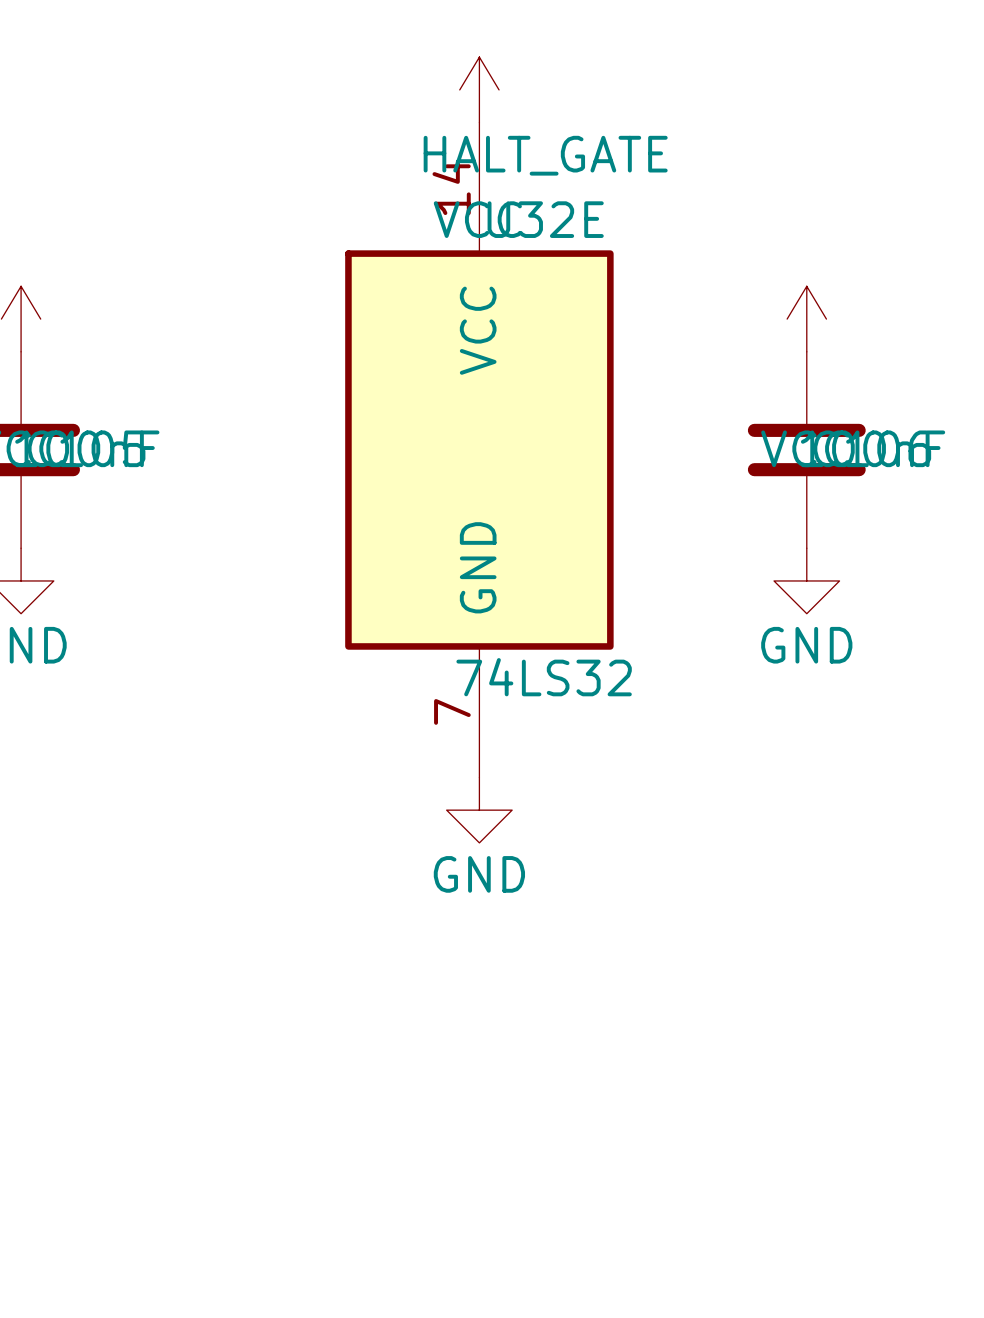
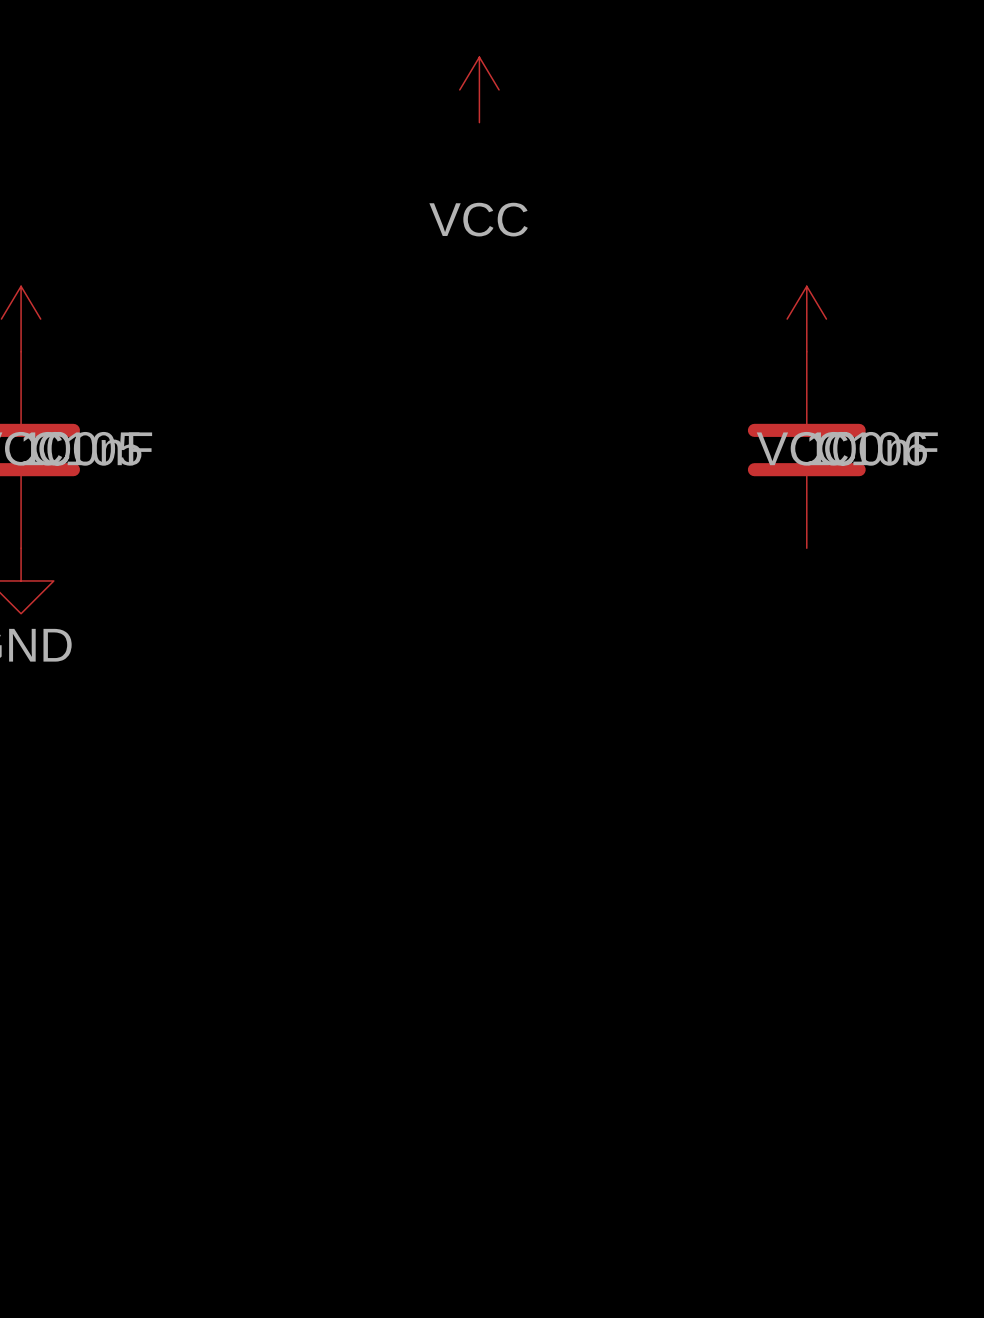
U32E: 74LS32 (479, 450) -> none
power symbol: GND (806, 580) -> none
power symbol: GND (479, 810) -> none

